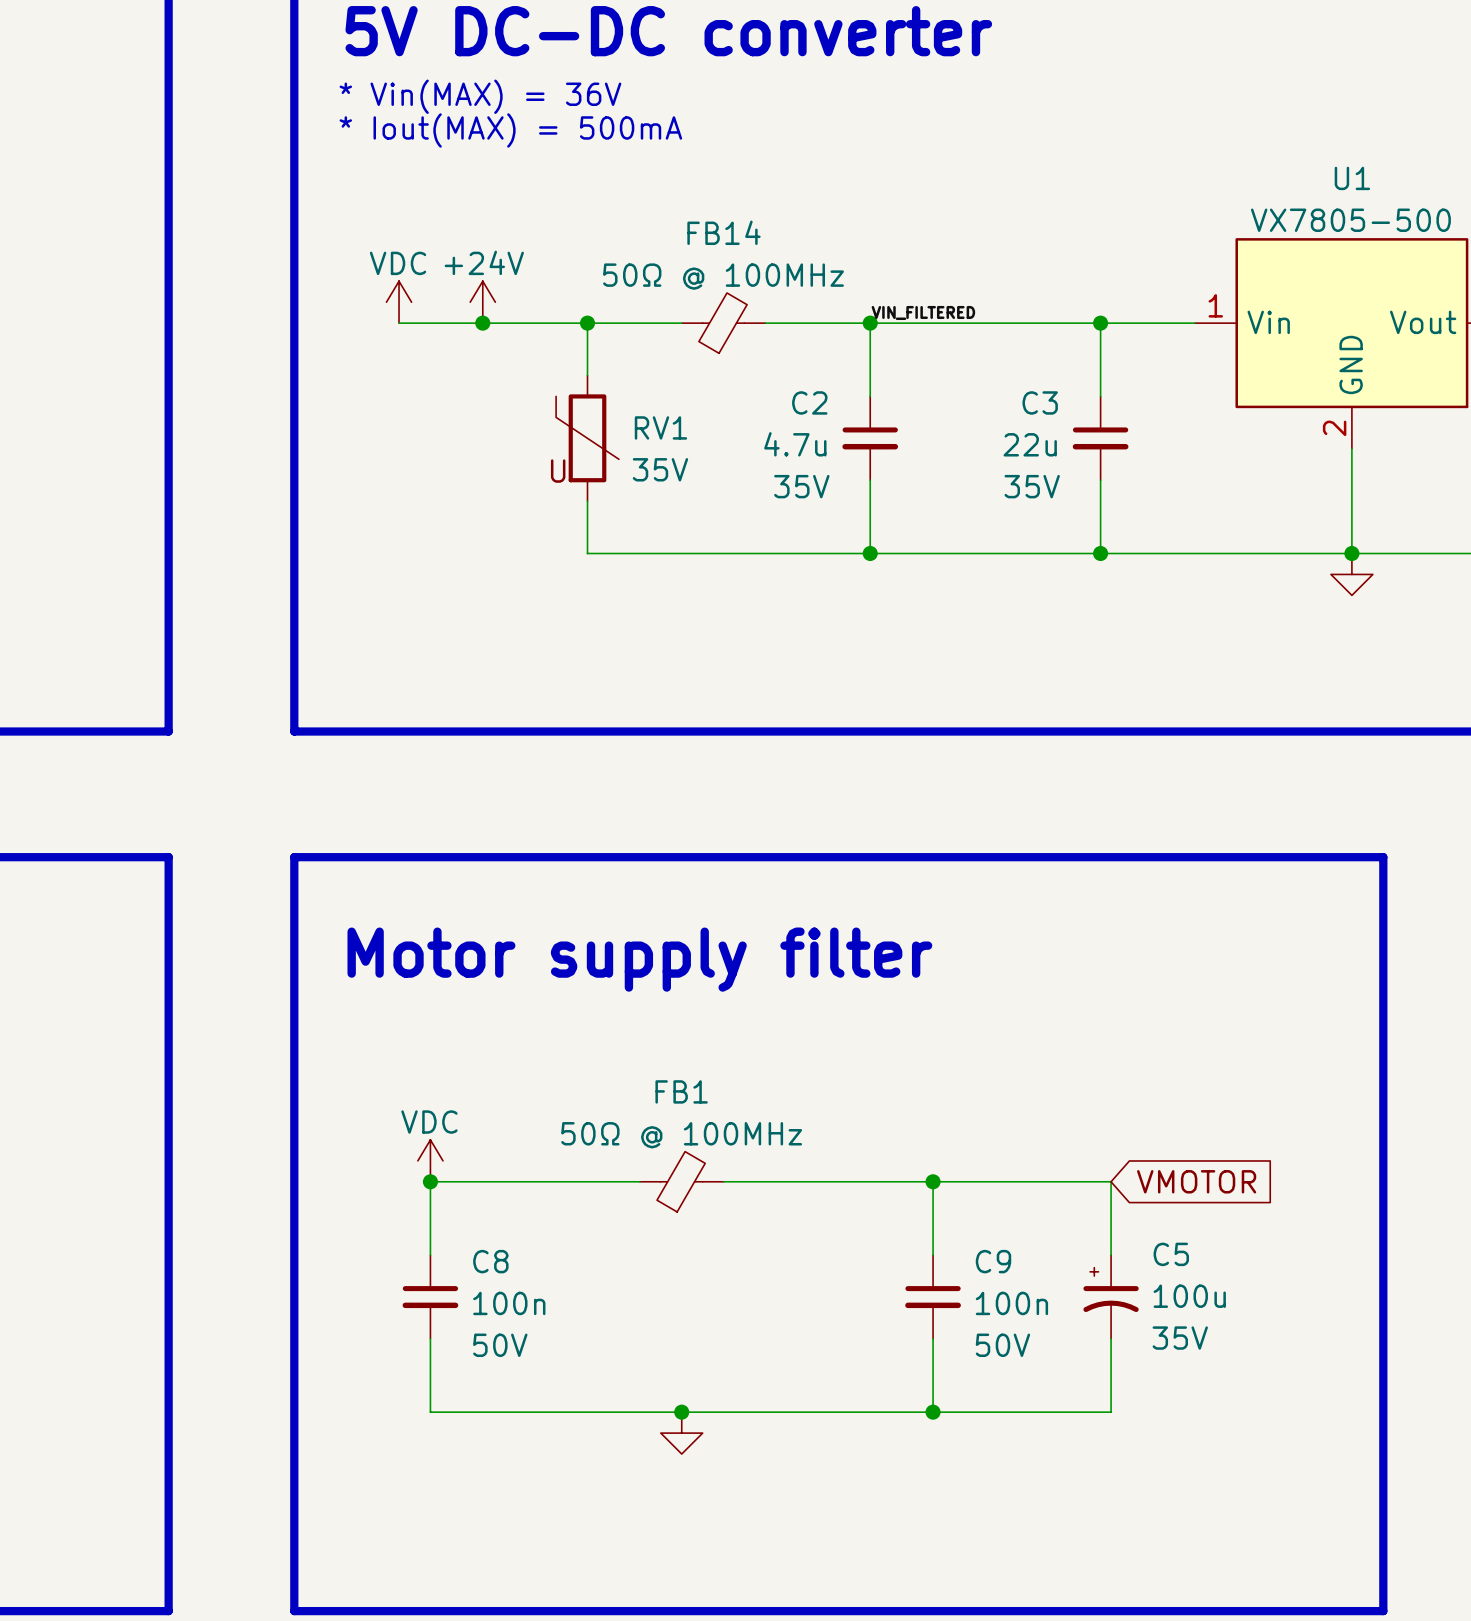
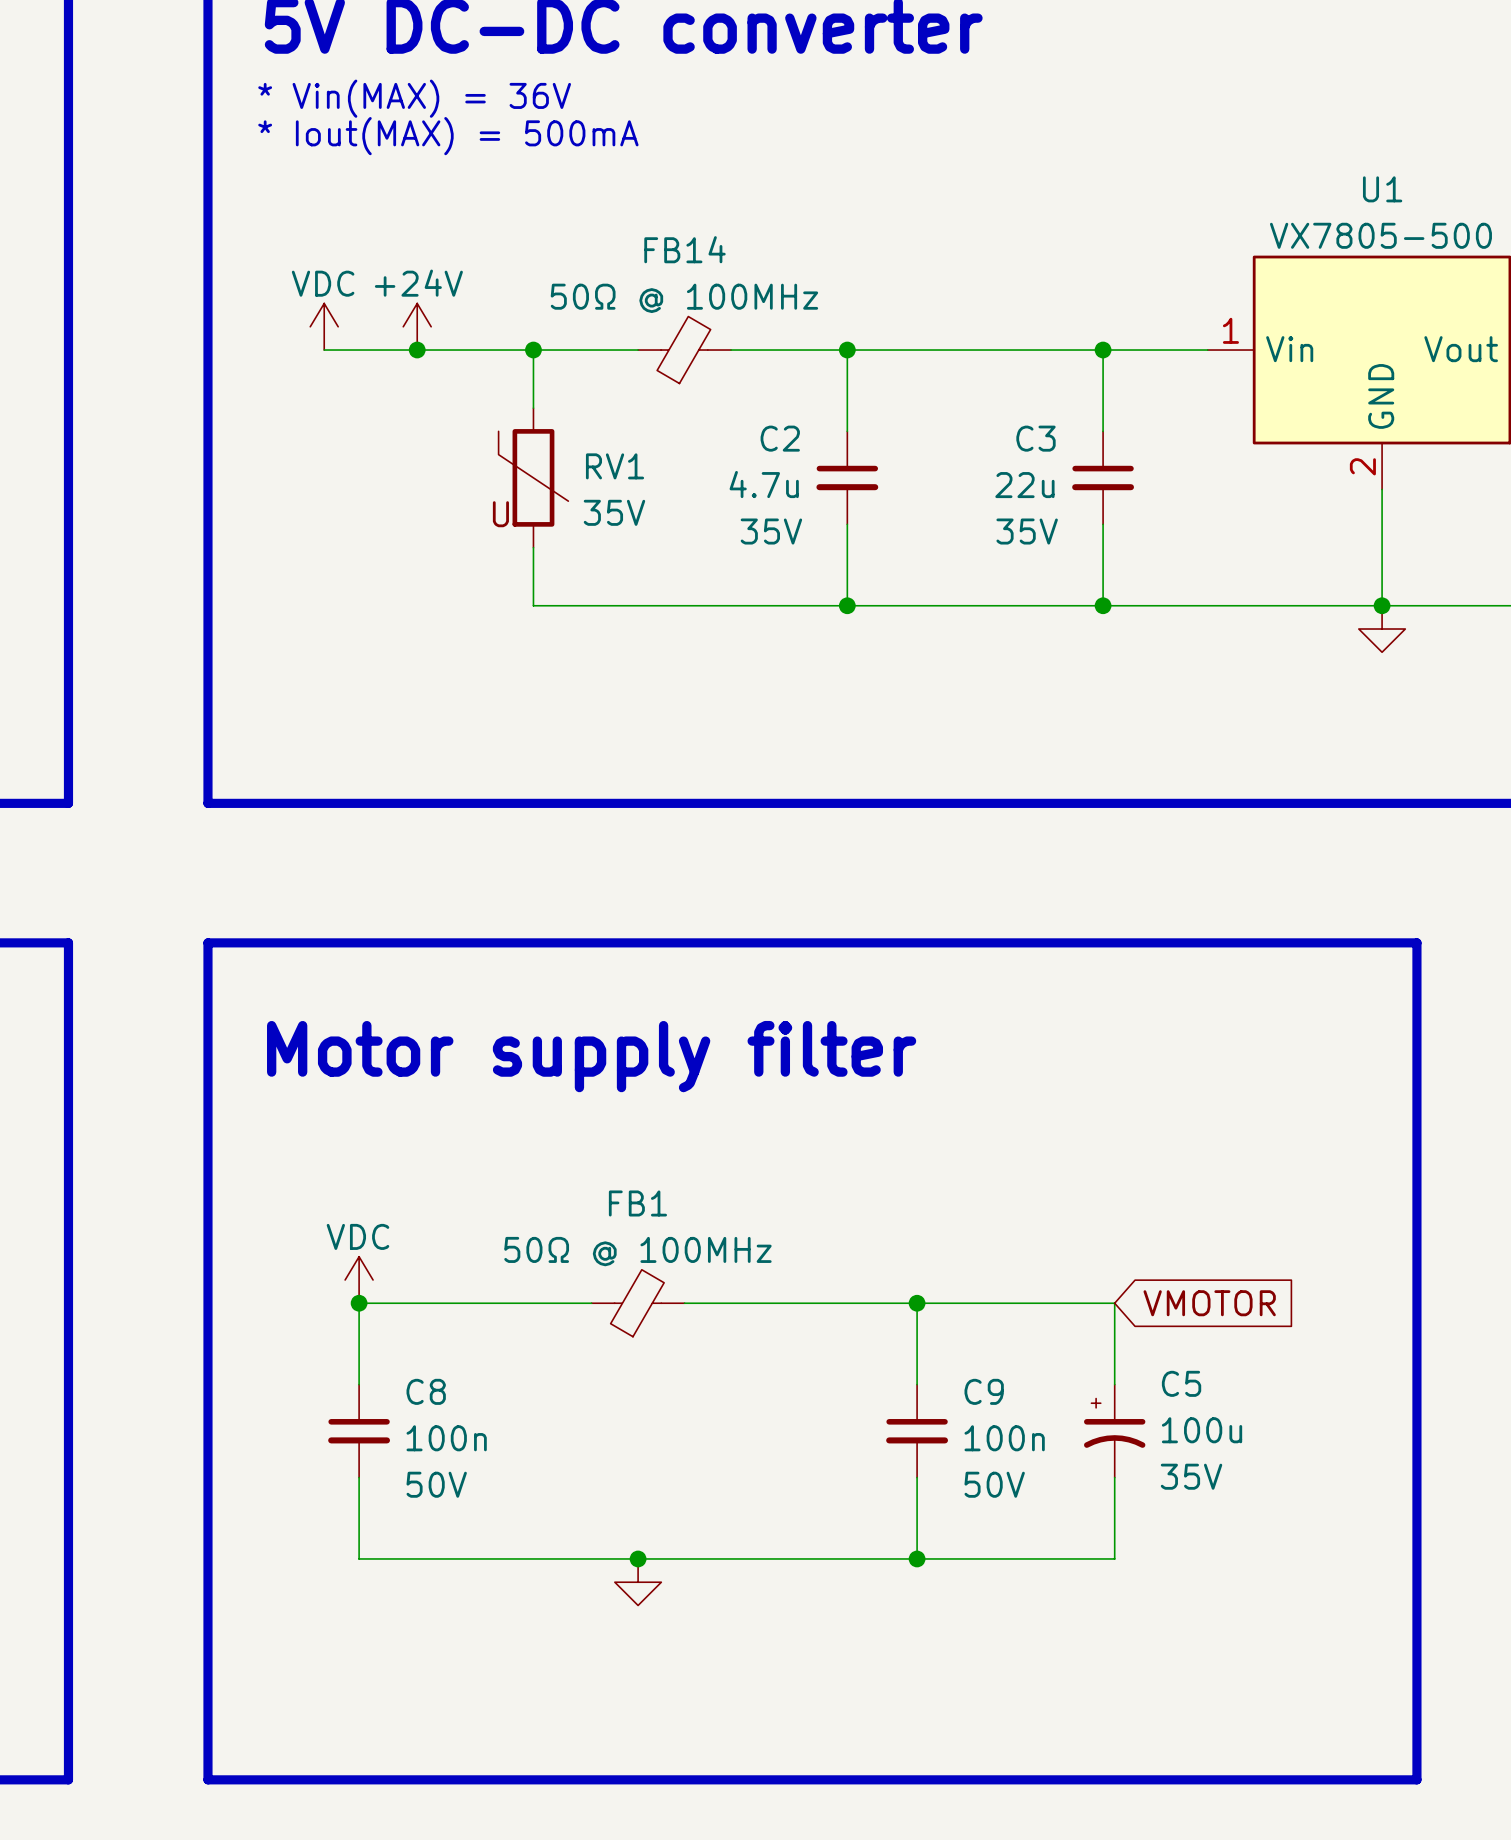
label: VIN_FILTERED (923, 312) -> none

